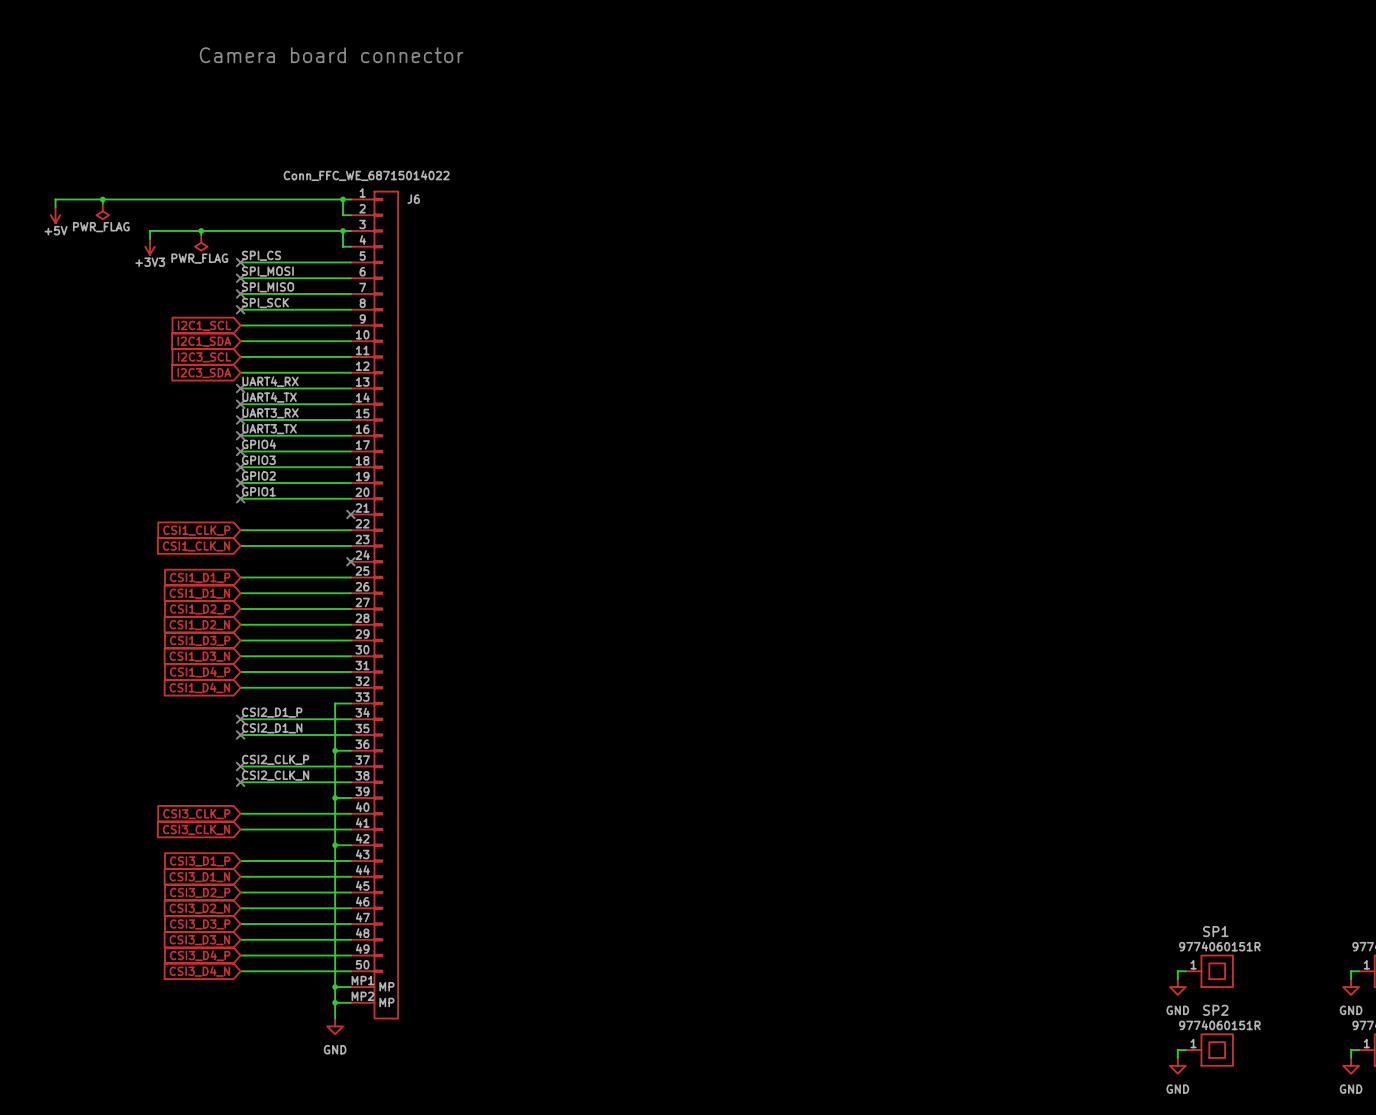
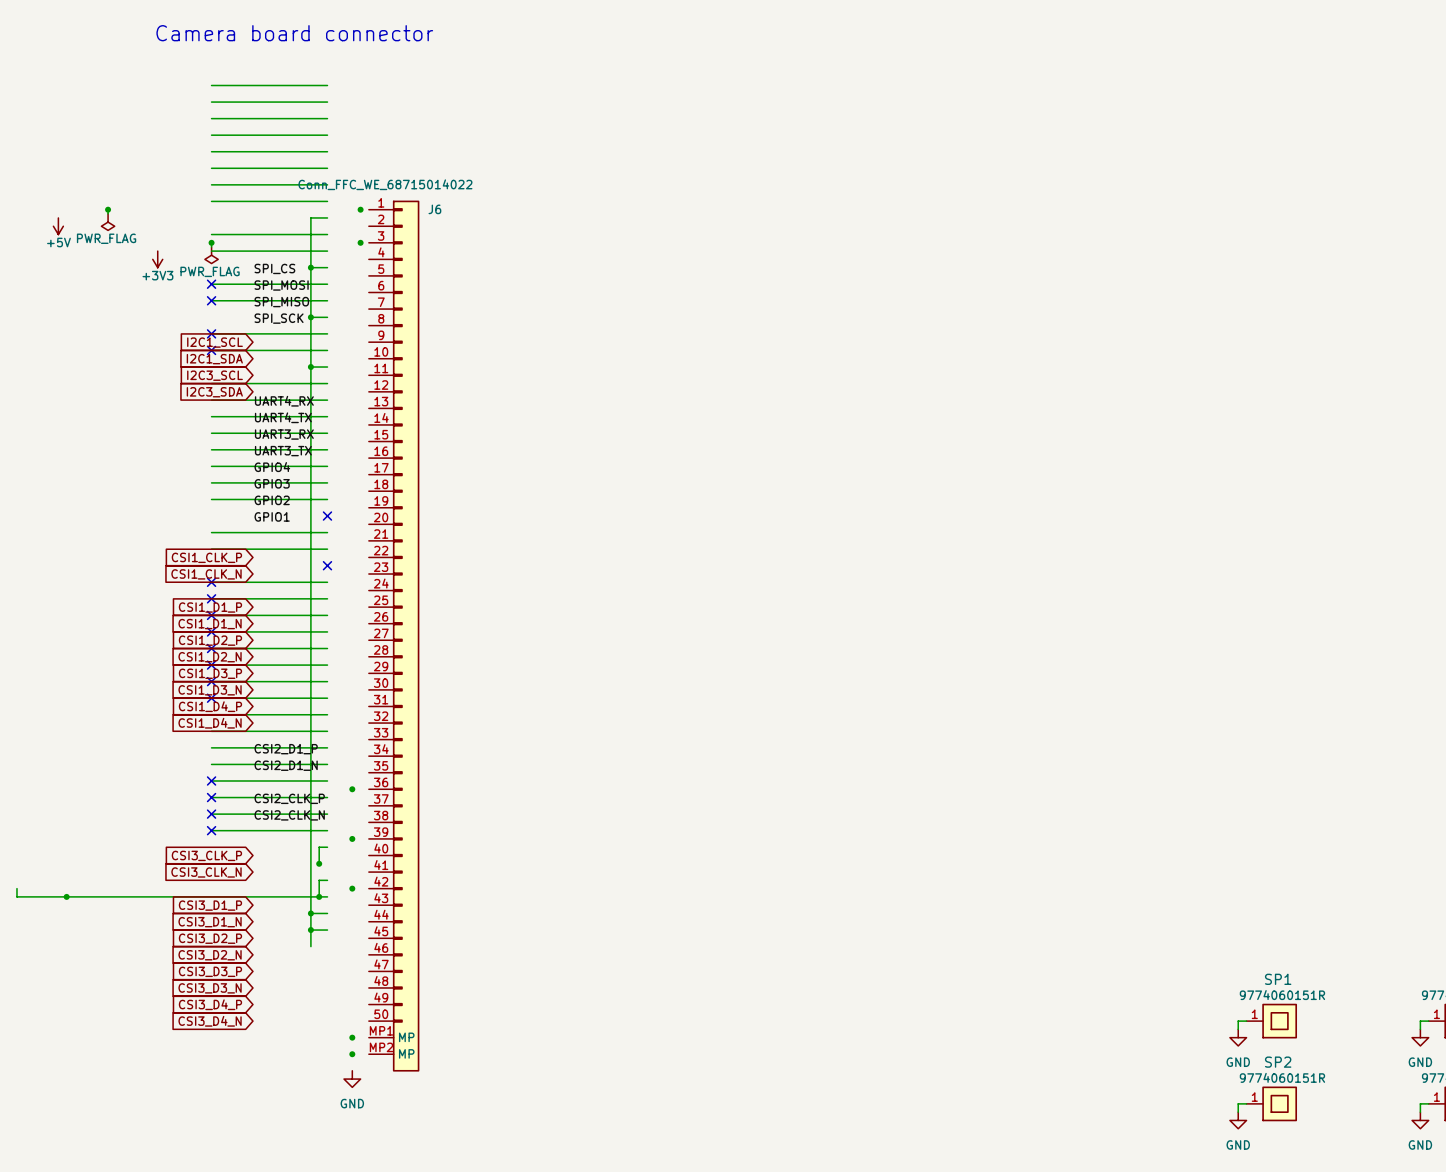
text position: Camera board connector (331, 55) -> Camera board connector (294, 33)
wire: none -> (211, 85) (327, 85)
wire: none -> (211, 102) (327, 102)
wire: none -> (211, 118) (327, 118)
wire: none -> (211, 135) (327, 135)
wire: (343, 199) (343, 215) (350, 215) -> none
wire: (350, 199) (55, 199) (55, 207) -> none
wire: none -> (327, 217) (310, 217) (310, 946)
wire: (343, 230) (343, 246) (350, 246) -> none
wire: (350, 230) (150, 230) (150, 238) -> none
wire: none -> (310, 267) (327, 267)
junction: none -> (310, 267)
wire: (240, 262) (350, 262) -> (211, 151) (327, 151)
no-connect mark: (240, 262) -> none
no-connect mark: none -> (211, 284)
wire: (240, 278) (350, 278) -> (211, 168) (327, 168)
no-connect mark: (240, 278) -> none
no-connect mark: none -> (211, 300)
wire: (240, 293) (350, 293) -> (211, 184) (327, 184)
no-connect mark: (240, 293) -> none
wire: none -> (310, 317) (327, 317)
junction: none -> (310, 317)
wire: (240, 309) (350, 309) -> (211, 201) (327, 201)
no-connect mark: (240, 309) -> none
no-connect mark: none -> (211, 333)
wire: (240, 325) (350, 325) -> none
no-connect mark: none -> (211, 350)
wire: (240, 341) (350, 341) -> (211, 234) (327, 234)
wire: none -> (310, 367) (327, 367)
junction: none -> (310, 367)
wire: (240, 356) (350, 356) -> (211, 251) (327, 251)
wire: (240, 372) (350, 372) -> none
wire: (240, 388) (350, 388) -> (211, 284) (327, 284)
no-connect mark: (240, 388) -> none
wire: (240, 404) (350, 404) -> (211, 300) (327, 300)
no-connect mark: (240, 404) -> none
wire: (240, 419) (350, 419) -> (211, 416) (327, 416)
no-connect mark: (240, 419) -> none
wire: (240, 435) (350, 435) -> (211, 333) (327, 333)
no-connect mark: (240, 435) -> none
wire: (240, 451) (350, 451) -> (211, 350) (327, 350)
no-connect mark: (240, 451) -> none
wire: (240, 467) (350, 467) -> (211, 466) (327, 466)
no-connect mark: (240, 467) -> none
wire: (240, 482) (350, 482) -> (211, 383) (327, 383)
no-connect mark: (240, 482) -> none
no-connect mark: none -> (327, 516)
wire: (240, 498) (350, 498) -> (211, 400) (327, 400)
no-connect mark: (240, 498) -> none
no-connect mark: (350, 514) -> none
wire: (240, 530) (350, 530) -> (211, 433) (327, 433)
no-connect mark: none -> (327, 565)
wire: (240, 545) (350, 545) -> (211, 449) (327, 449)
no-connect mark: none -> (211, 582)
no-connect mark: (350, 561) -> none
no-connect mark: none -> (211, 598)
wire: (240, 577) (350, 577) -> (211, 482) (327, 482)
no-connect mark: none -> (211, 615)
wire: (240, 593) (350, 593) -> (211, 499) (327, 499)
no-connect mark: none -> (211, 631)
wire: (240, 609) (350, 609) -> (211, 615) (327, 615)
no-connect mark: none -> (211, 648)
wire: (240, 624) (350, 624) -> (211, 532) (327, 532)
no-connect mark: none -> (211, 665)
wire: (240, 640) (350, 640) -> (211, 549) (327, 549)
no-connect mark: none -> (211, 681)
wire: (240, 656) (350, 656) -> (211, 665) (327, 665)
no-connect mark: none -> (211, 698)
wire: (240, 672) (350, 672) -> (211, 582) (327, 582)
wire: none -> (211, 714) (327, 714)
wire: (240, 687) (350, 687) -> (211, 598) (327, 598)
wire: (350, 703) (335, 703) (335, 1018) -> none
wire: (240, 719) (350, 719) -> (211, 631) (327, 631)
no-connect mark: (240, 719) -> none
wire: none -> (211, 764) (327, 764)
wire: (240, 735) (350, 735) -> (211, 648) (327, 648)
no-connect mark: (240, 735) -> none
no-connect mark: none -> (211, 780)
wire: (335, 750) (350, 750) -> none
no-connect mark: none -> (211, 797)
wire: (240, 766) (350, 766) -> (211, 681) (327, 681)
no-connect mark: (240, 766) -> none
no-connect mark: none -> (211, 814)
wire: (240, 782) (350, 782) -> (211, 698) (327, 698)
no-connect mark: (240, 782) -> none
no-connect mark: none -> (211, 830)
wire: (335, 798) (350, 798) -> none
wire: none -> (327, 847) (319, 847) (319, 863)
wire: (240, 813) (350, 813) -> (211, 731) (327, 731)
junction: none -> (319, 863)
wire: (240, 829) (350, 829) -> (211, 747) (327, 747)
wire: none -> (327, 880) (319, 880) (319, 896)
wire: none -> (16, 888) (16, 896) (327, 896)
wire: (335, 845) (350, 845) -> none
junction: none -> (66, 896)
junction: none -> (319, 896)
wire: (240, 861) (350, 861) -> (211, 780) (327, 780)
junction: none -> (310, 913)
wire: (240, 876) (350, 876) -> (211, 797) (327, 797)
junction: none -> (310, 930)
wire: (240, 892) (350, 892) -> (211, 814) (327, 814)
wire: (240, 908) (350, 908) -> (211, 830) (327, 830)
wire: (240, 924) (350, 924) -> none
wire: (240, 939) (350, 939) -> none
wire: (240, 955) (350, 955) -> none
wire: (240, 971) (350, 971) -> none
wire: (335, 987) (350, 987) -> (310, 913) (327, 913)
wire: (335, 1002) (350, 1002) -> (310, 930) (327, 930)

